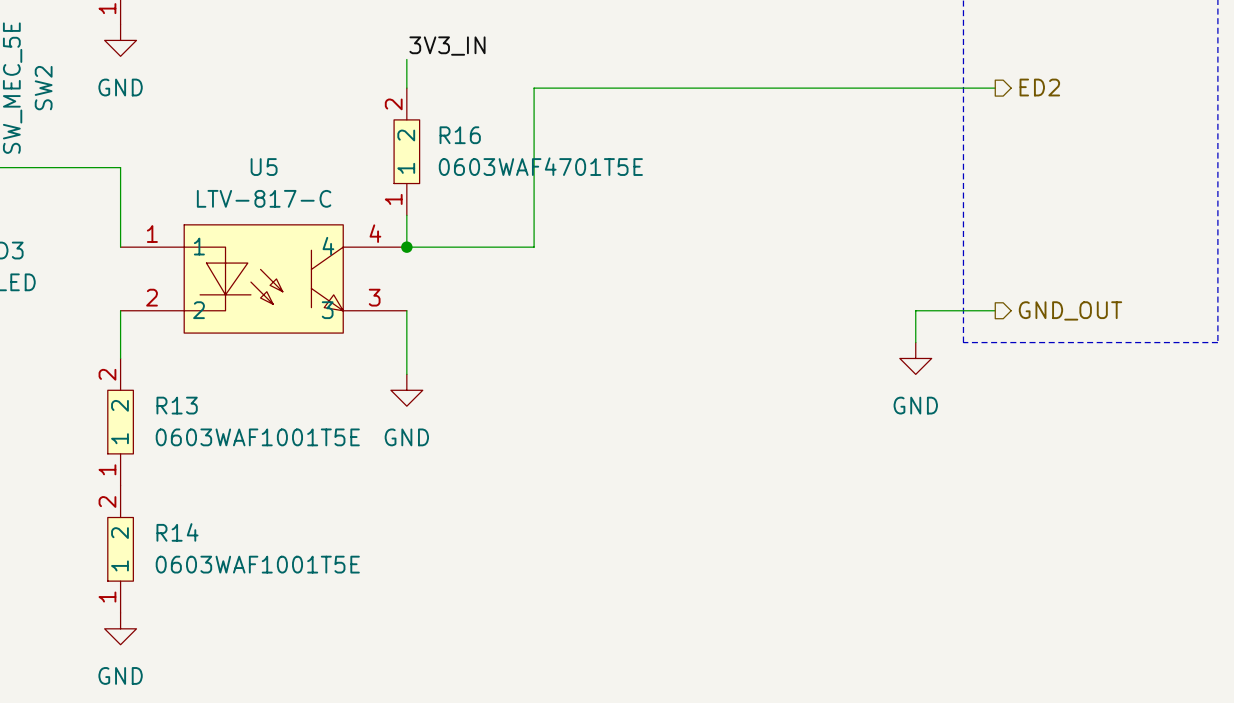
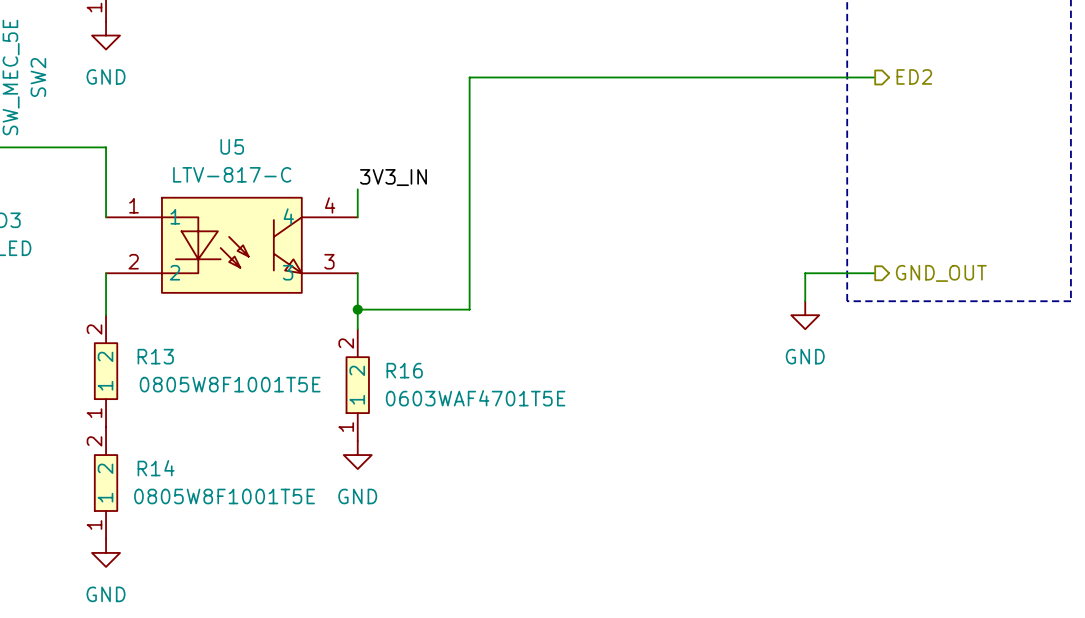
label position: 3V3_IN (447, 46) -> 3V3_IN (393, 177)
wire: (406, 59) (406, 88) -> none
R16 position: (406, 151) -> (357, 385)
wire: (406, 247) (534, 247) -> (357, 309) (469, 309) (469, 217)
junction: (406, 247) -> none
junction: none -> (357, 309)
power symbol position: GND (406, 390) -> GND (357, 455)
R13 value: 0603WAF1001T5E (257, 437) -> 0805W8F1001T5E (230, 384)
R14 value: 0603WAF1001T5E (257, 564) -> 0805W8F1001T5E (224, 496)

